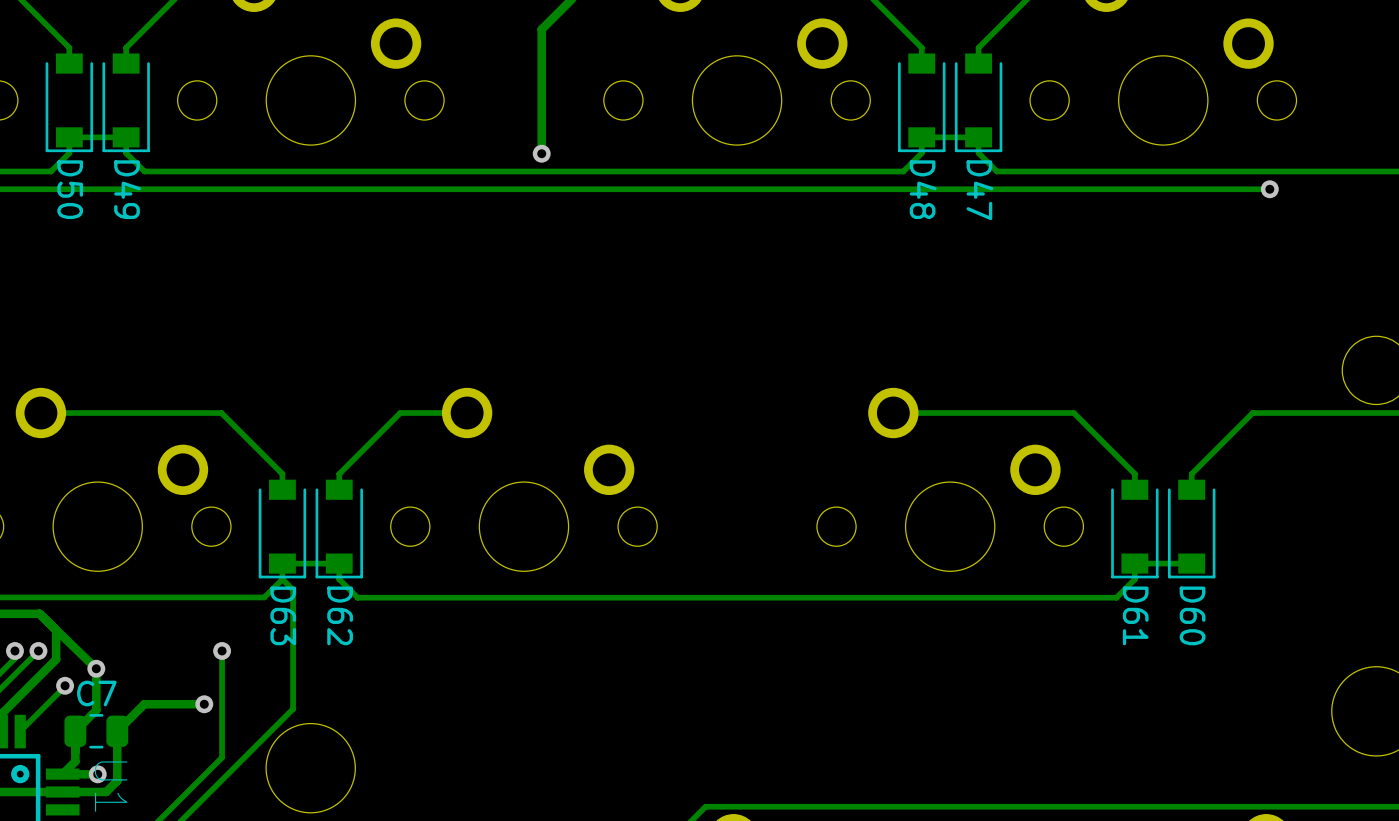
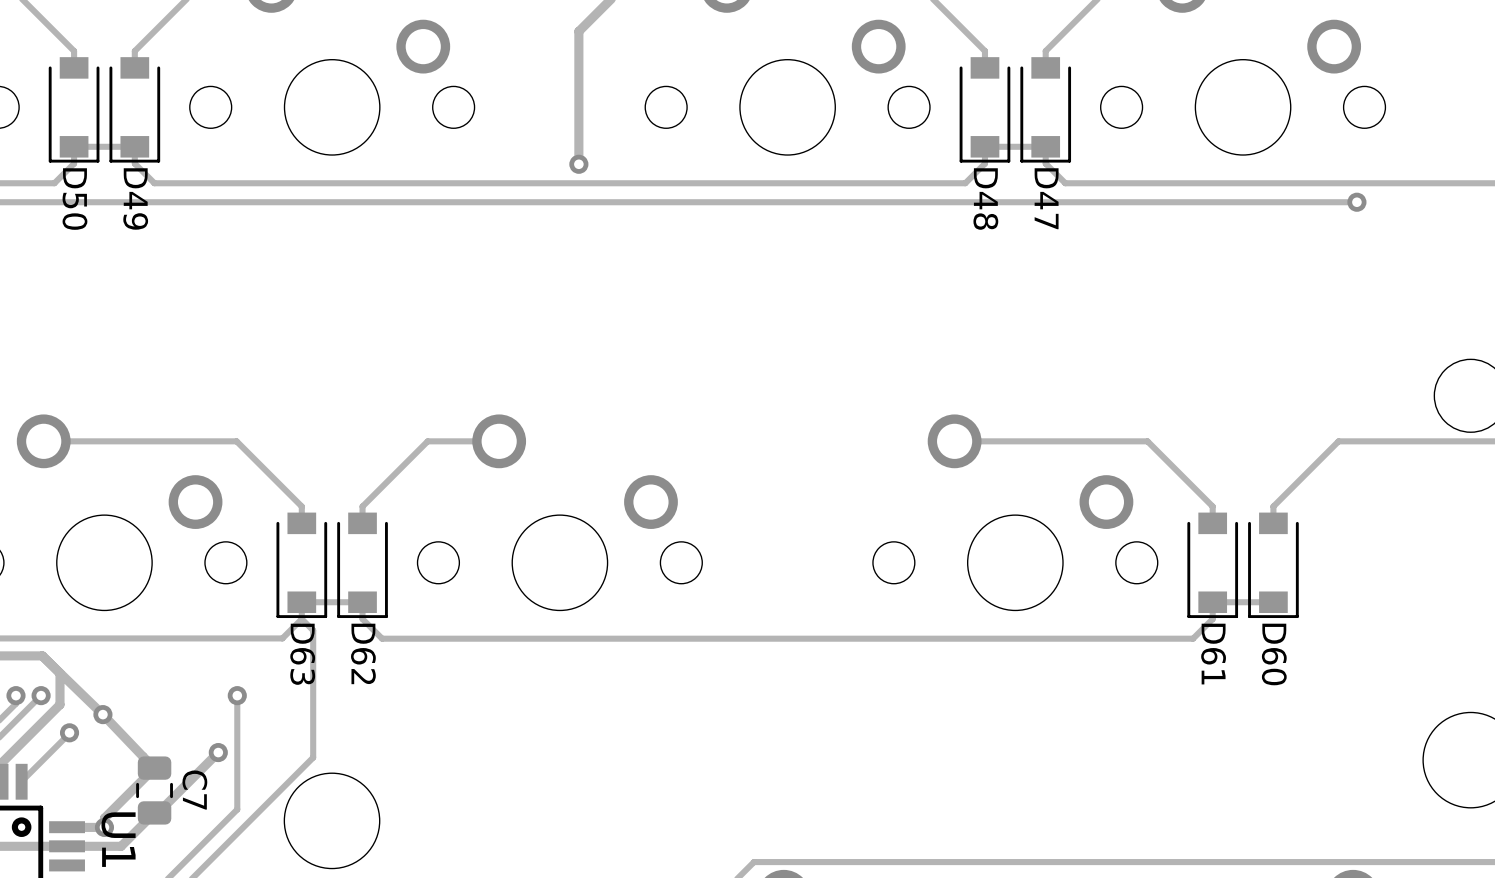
track: (96, 668) (96, 710) (75, 731) (75, 761) (62, 774) -> (102, 714) (154, 768) (104, 818) (104, 827)
track: (204, 704) (144, 704) (117, 731) (117, 780) (106, 791) -> (218, 752) (157, 812) (154, 812) (121, 846) (113, 846)
C7 rotation: 0° (96, 731) -> 90° clockwise (154, 790)
C7 position: (96, 731) -> (154, 790)

